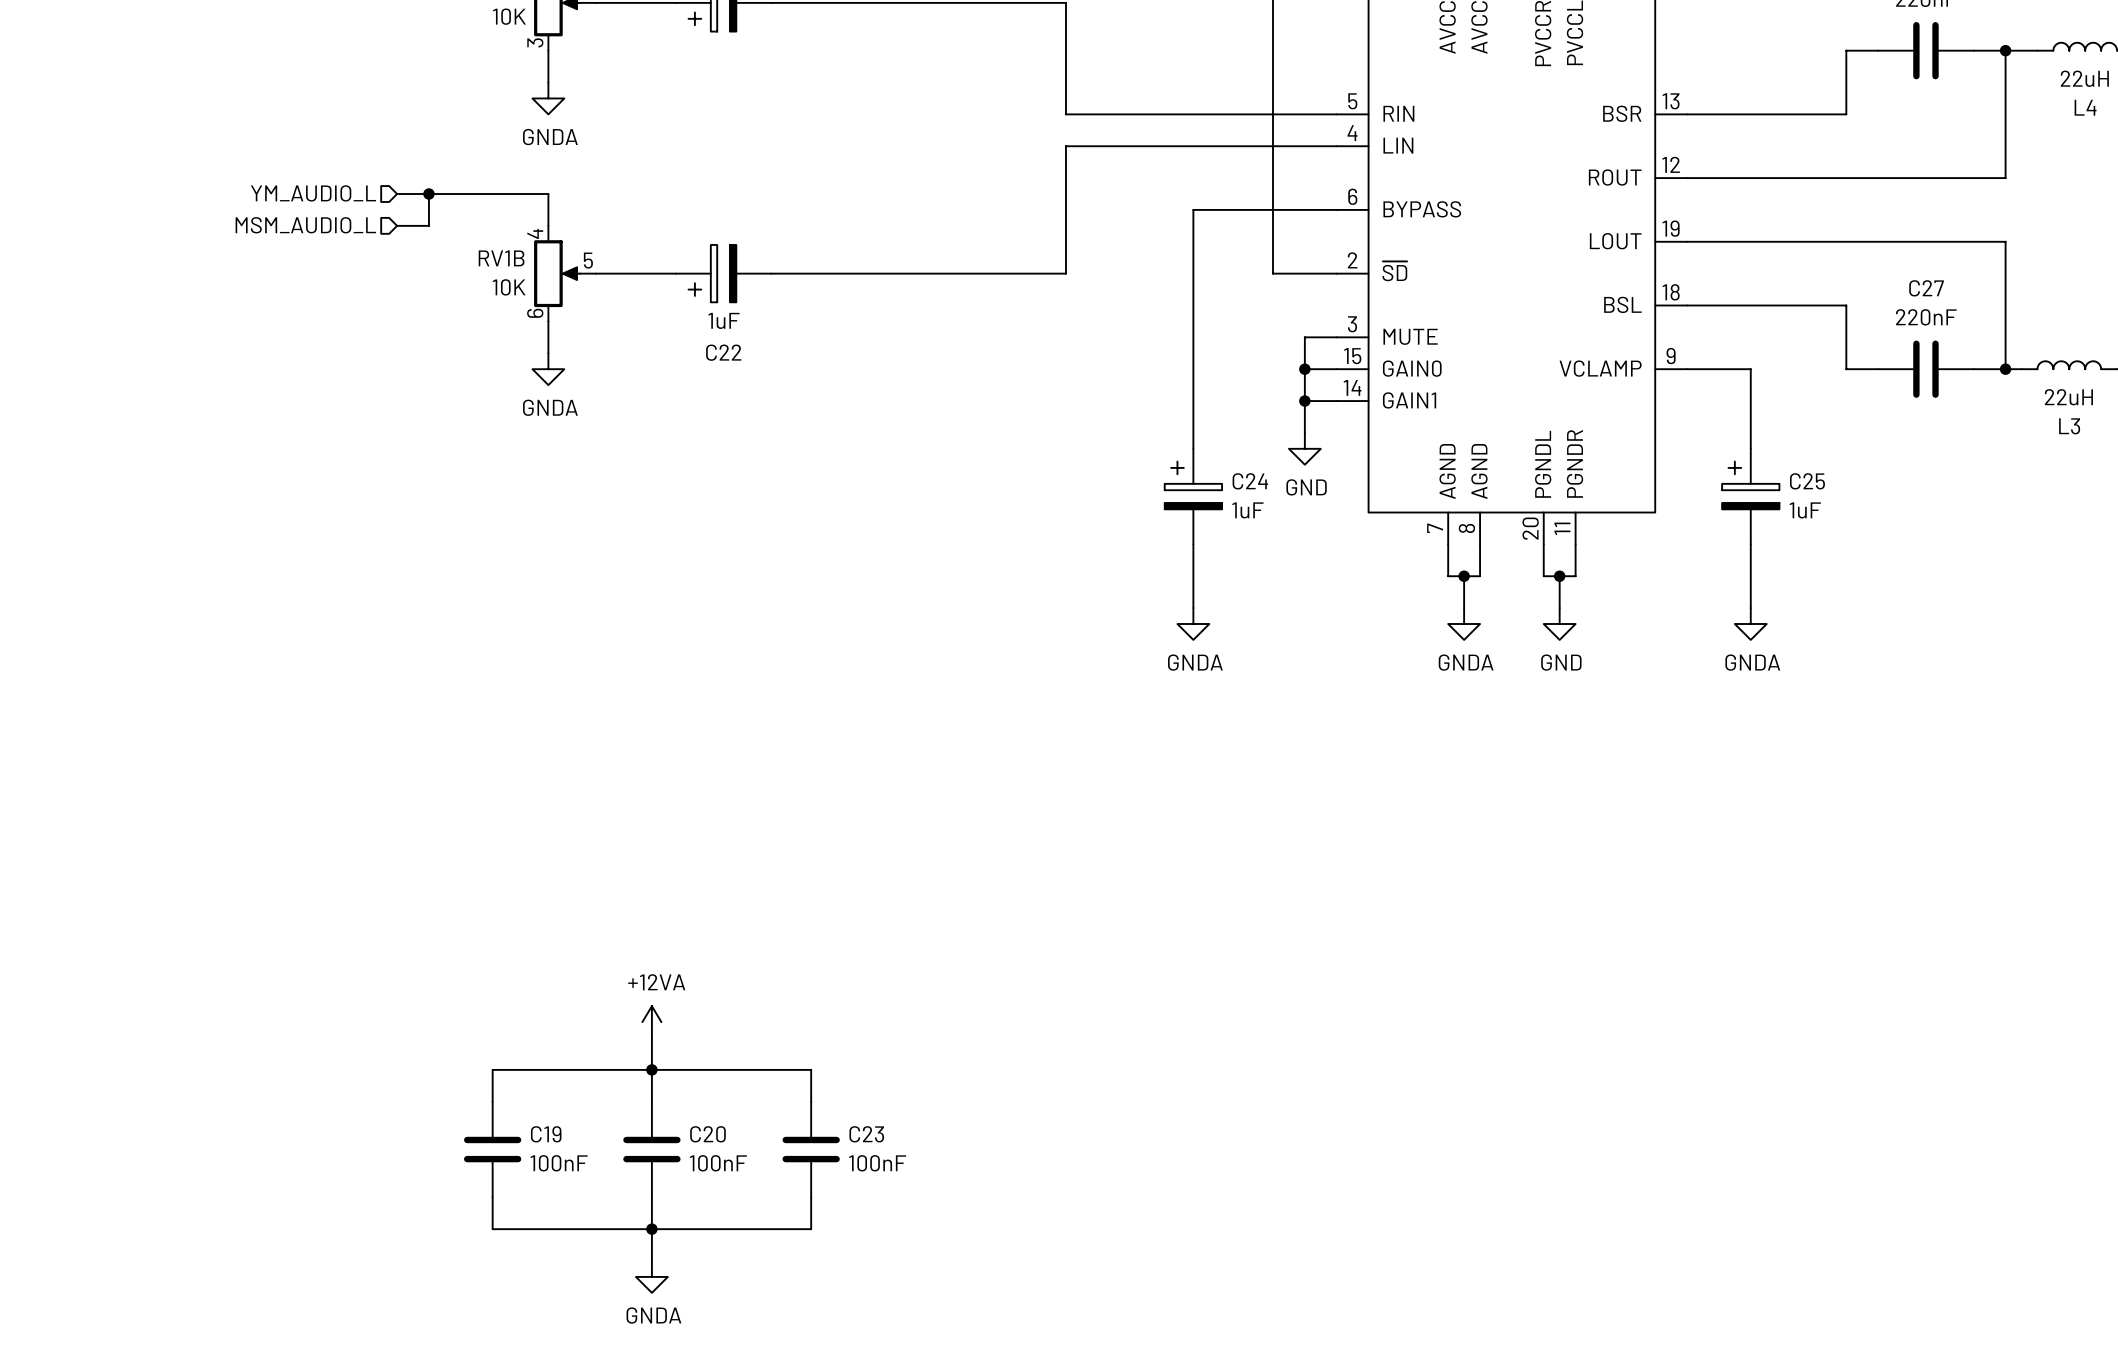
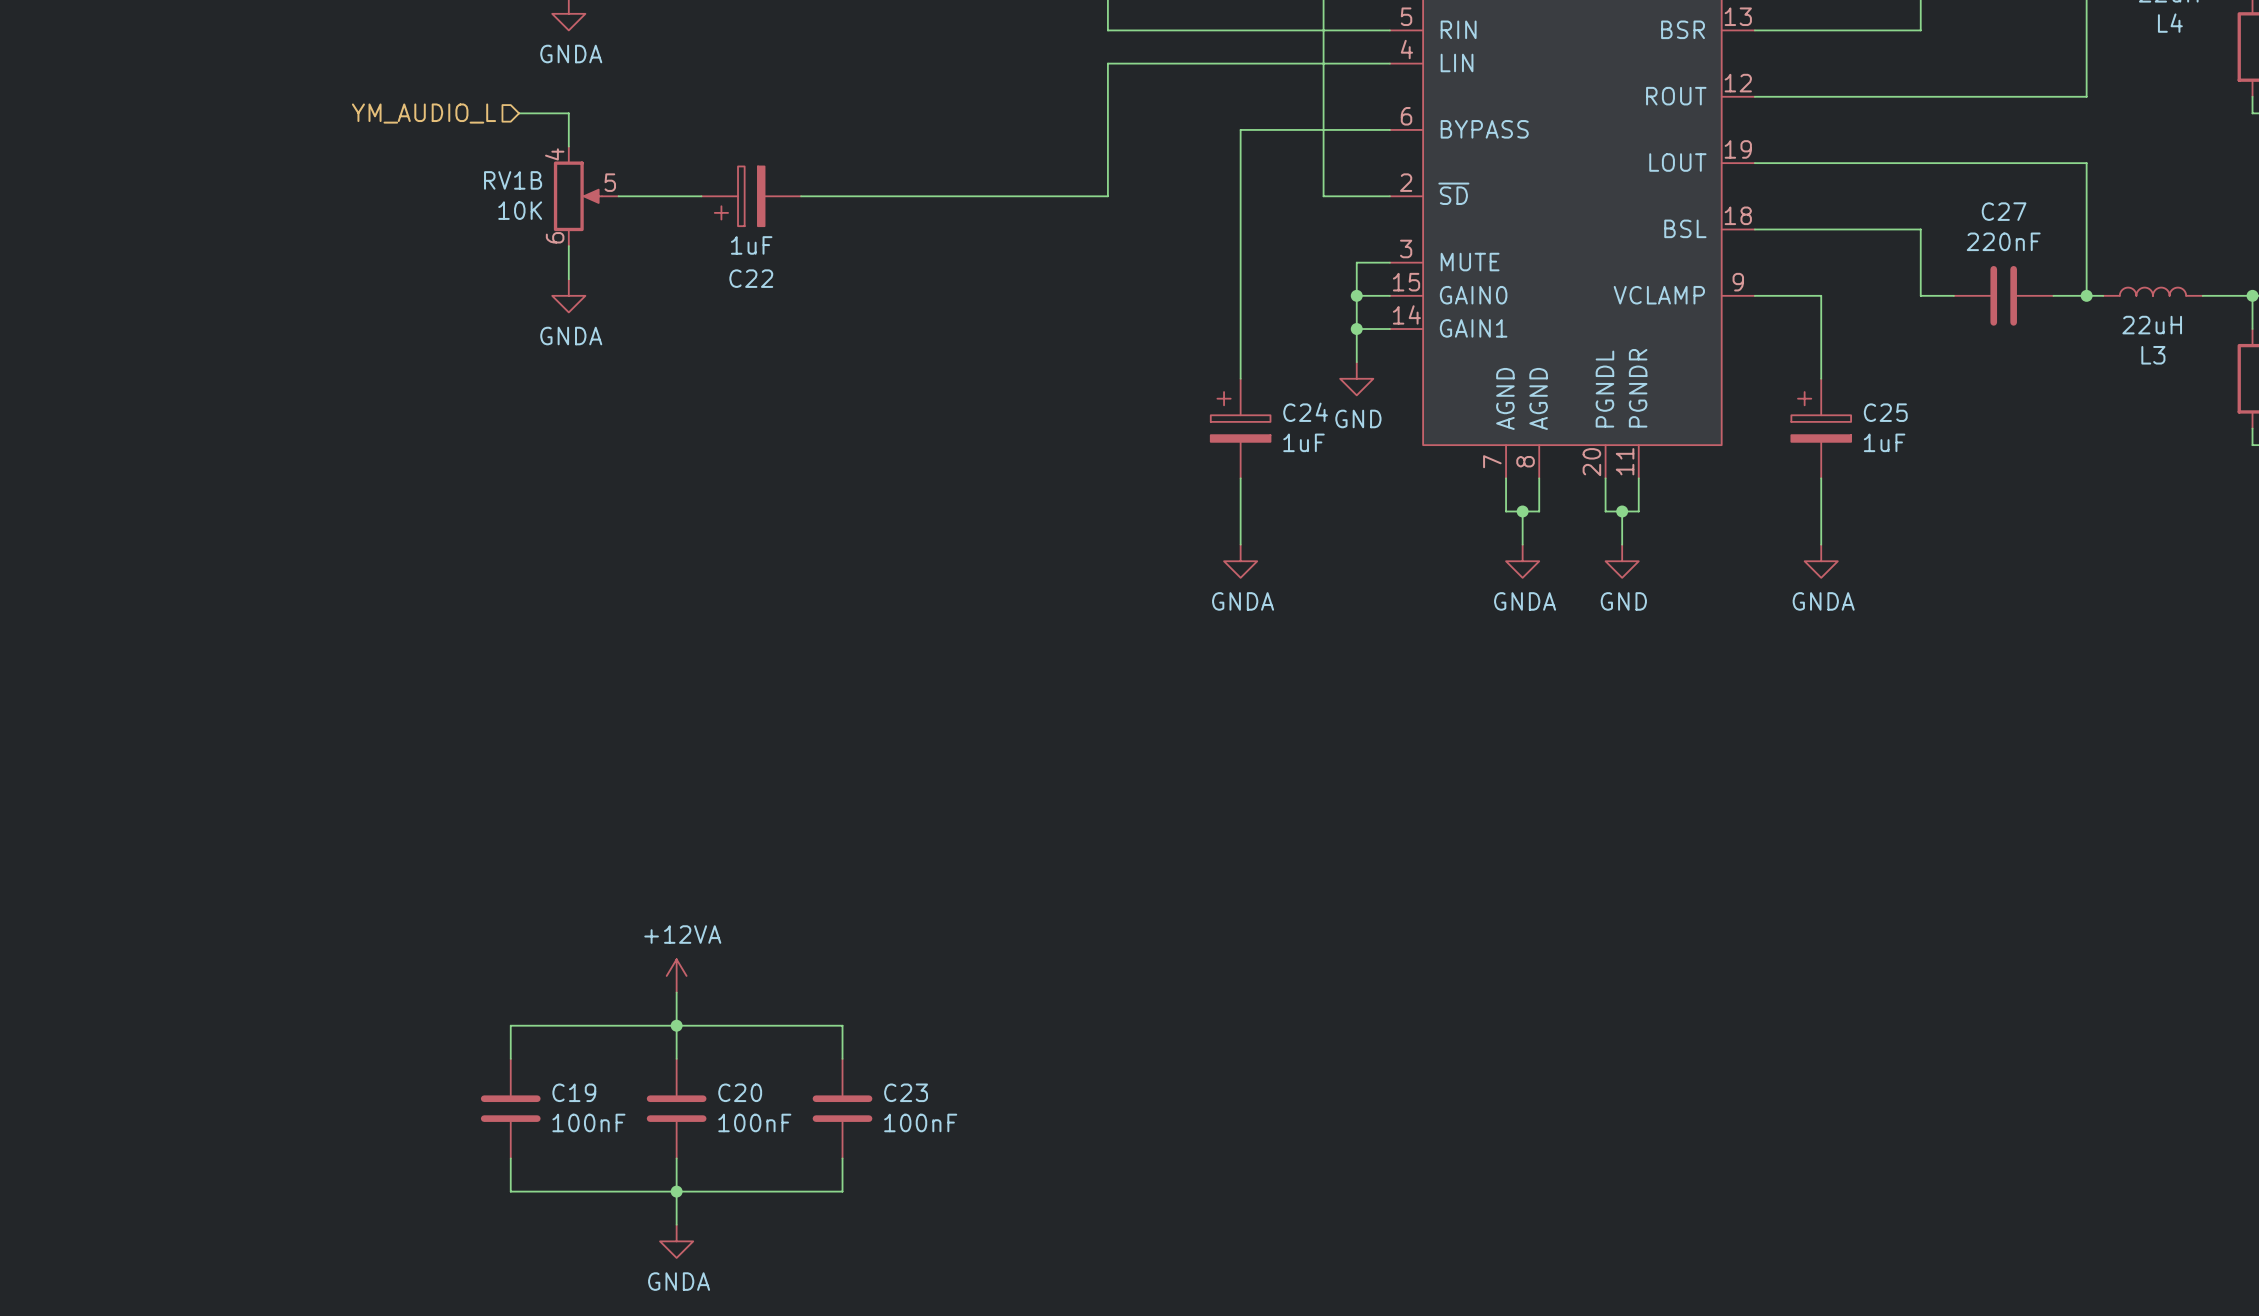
hierarchical label position: YM_AUDIO_L (313, 193) -> YM_AUDIO_L (423, 113)
wire: (397, 194) (500, 194) -> none
wire: (428, 194) (428, 225) (397, 225) -> none
junction: (428, 194) -> none
hierarchical label: MSM_AUDIO_L (305, 225) -> none

